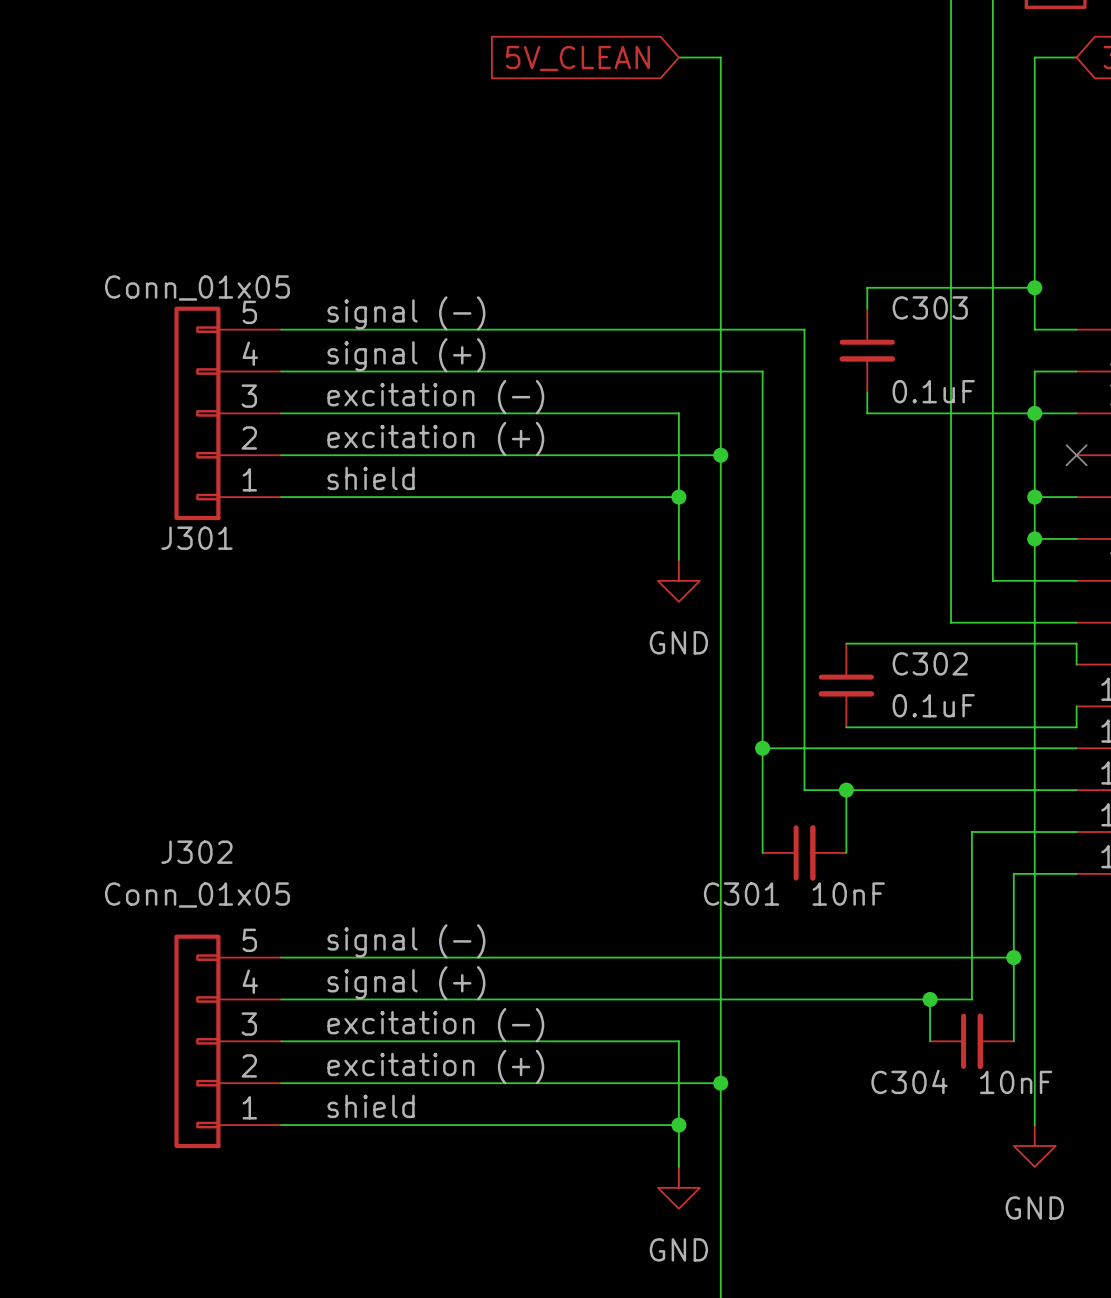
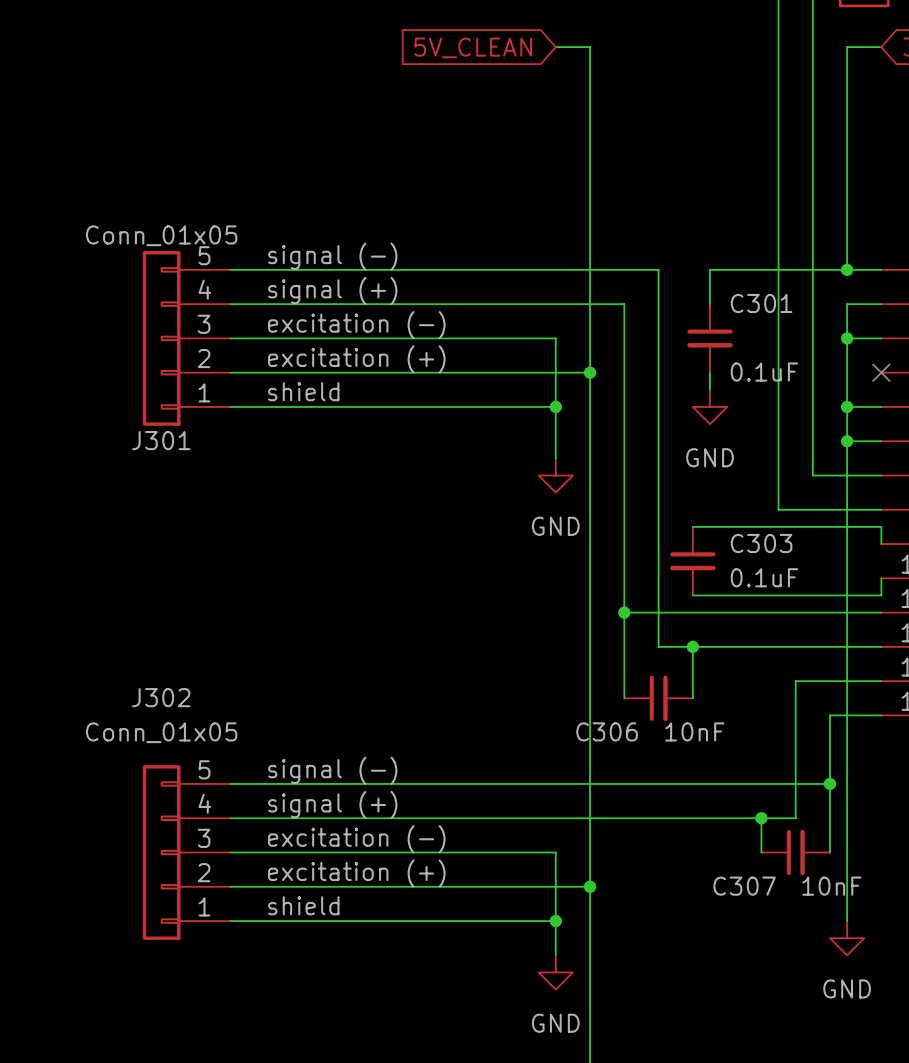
wire: (1034, 287) (867, 287) (867, 308) -> none
junction position: (1034, 287) -> (847, 269)
wire: none -> (847, 269) (710, 269) (710, 304)
C303: 0.1uF (867, 350) -> none
wire: (867, 392) (867, 413) (1034, 413) -> none
C301: none -> 0.1uF (710, 338)
wire: none -> (710, 372) (710, 389)
power symbol: none -> GND (710, 406)
C302 name: C302 (930, 663) -> C303 (761, 543)
C301 name: C301 (741, 894) -> C306 (607, 731)
C304 name: C304 (909, 1081) -> C307 (744, 886)

